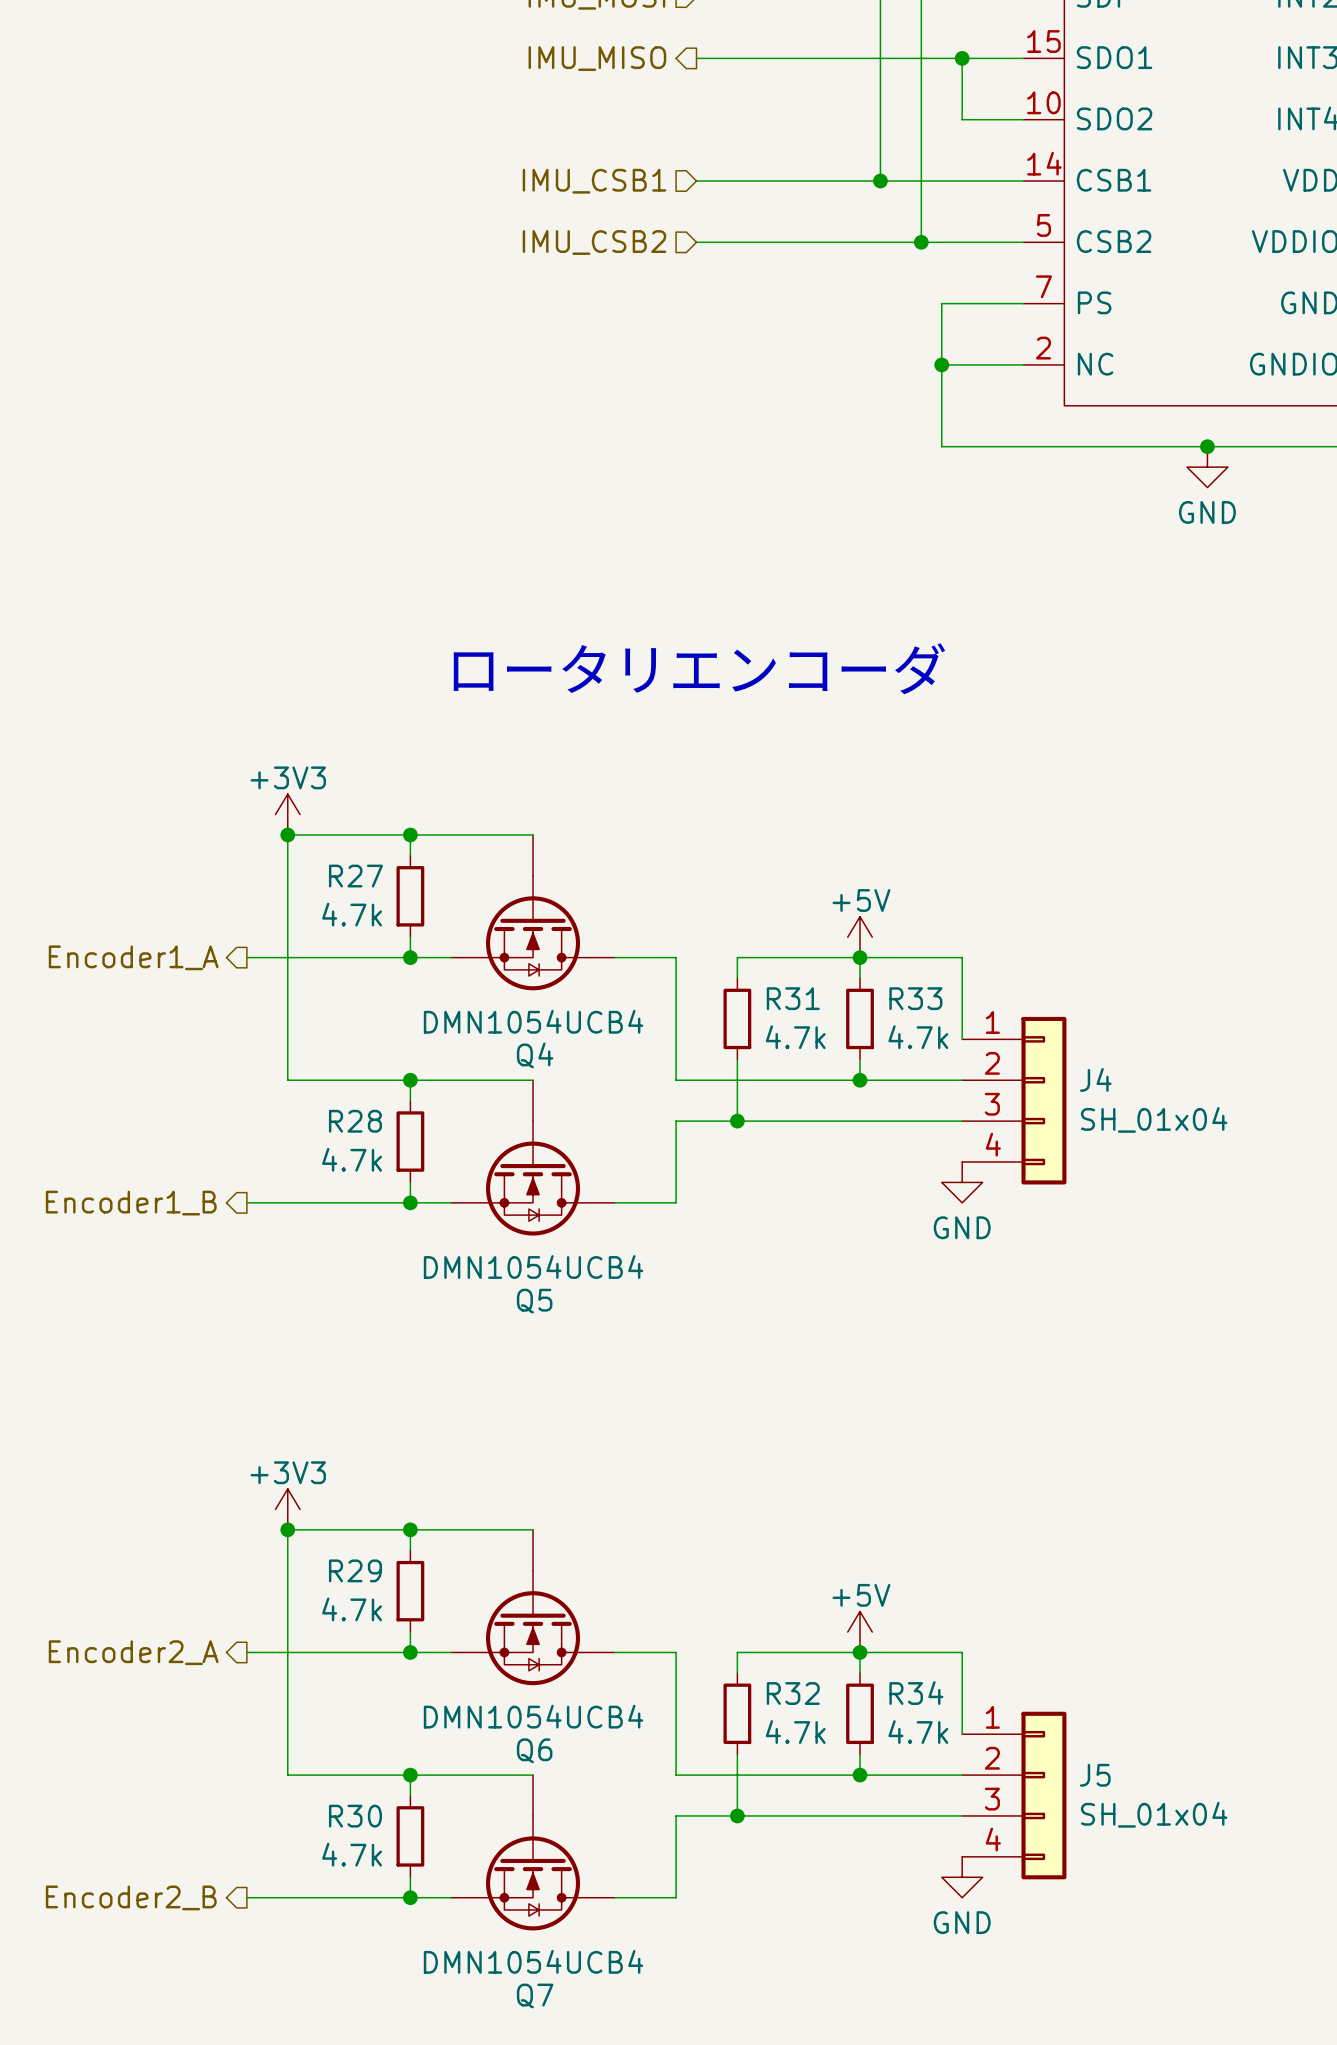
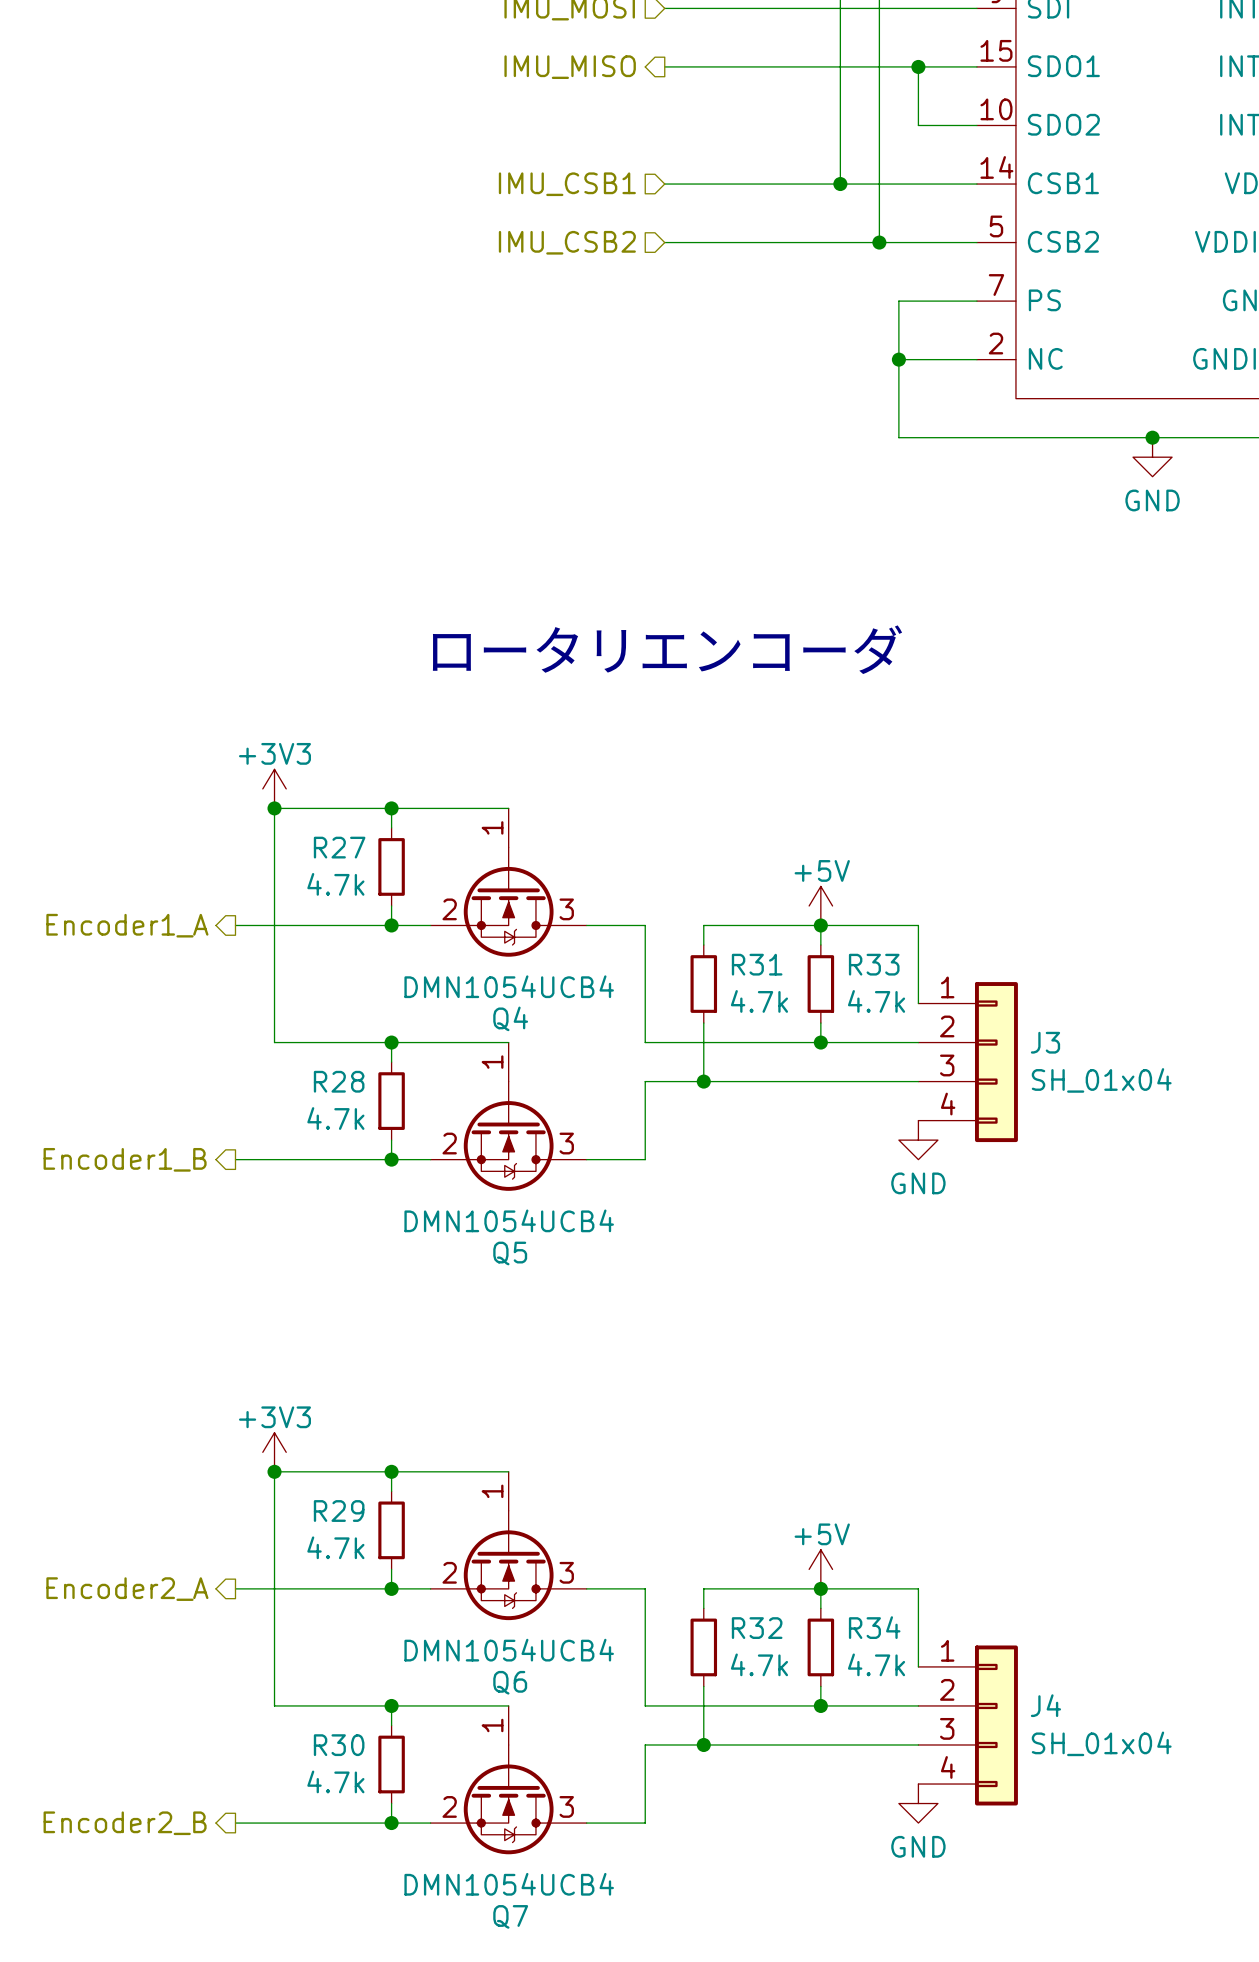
Q4 symbol: [451, 834, 615, 991] -> [430, 808, 587, 957]
J4 name: J4 (1095, 1079) -> J3 (1045, 1042)
Q5 symbol: [451, 1080, 615, 1236] -> [430, 1042, 587, 1191]
Q6 symbol: [451, 1529, 615, 1686] -> [430, 1471, 587, 1621]
Q7 symbol: [451, 1775, 615, 1931] -> [430, 1705, 587, 1855]
J5 name: J5 (1095, 1775) -> J4 (1045, 1705)

